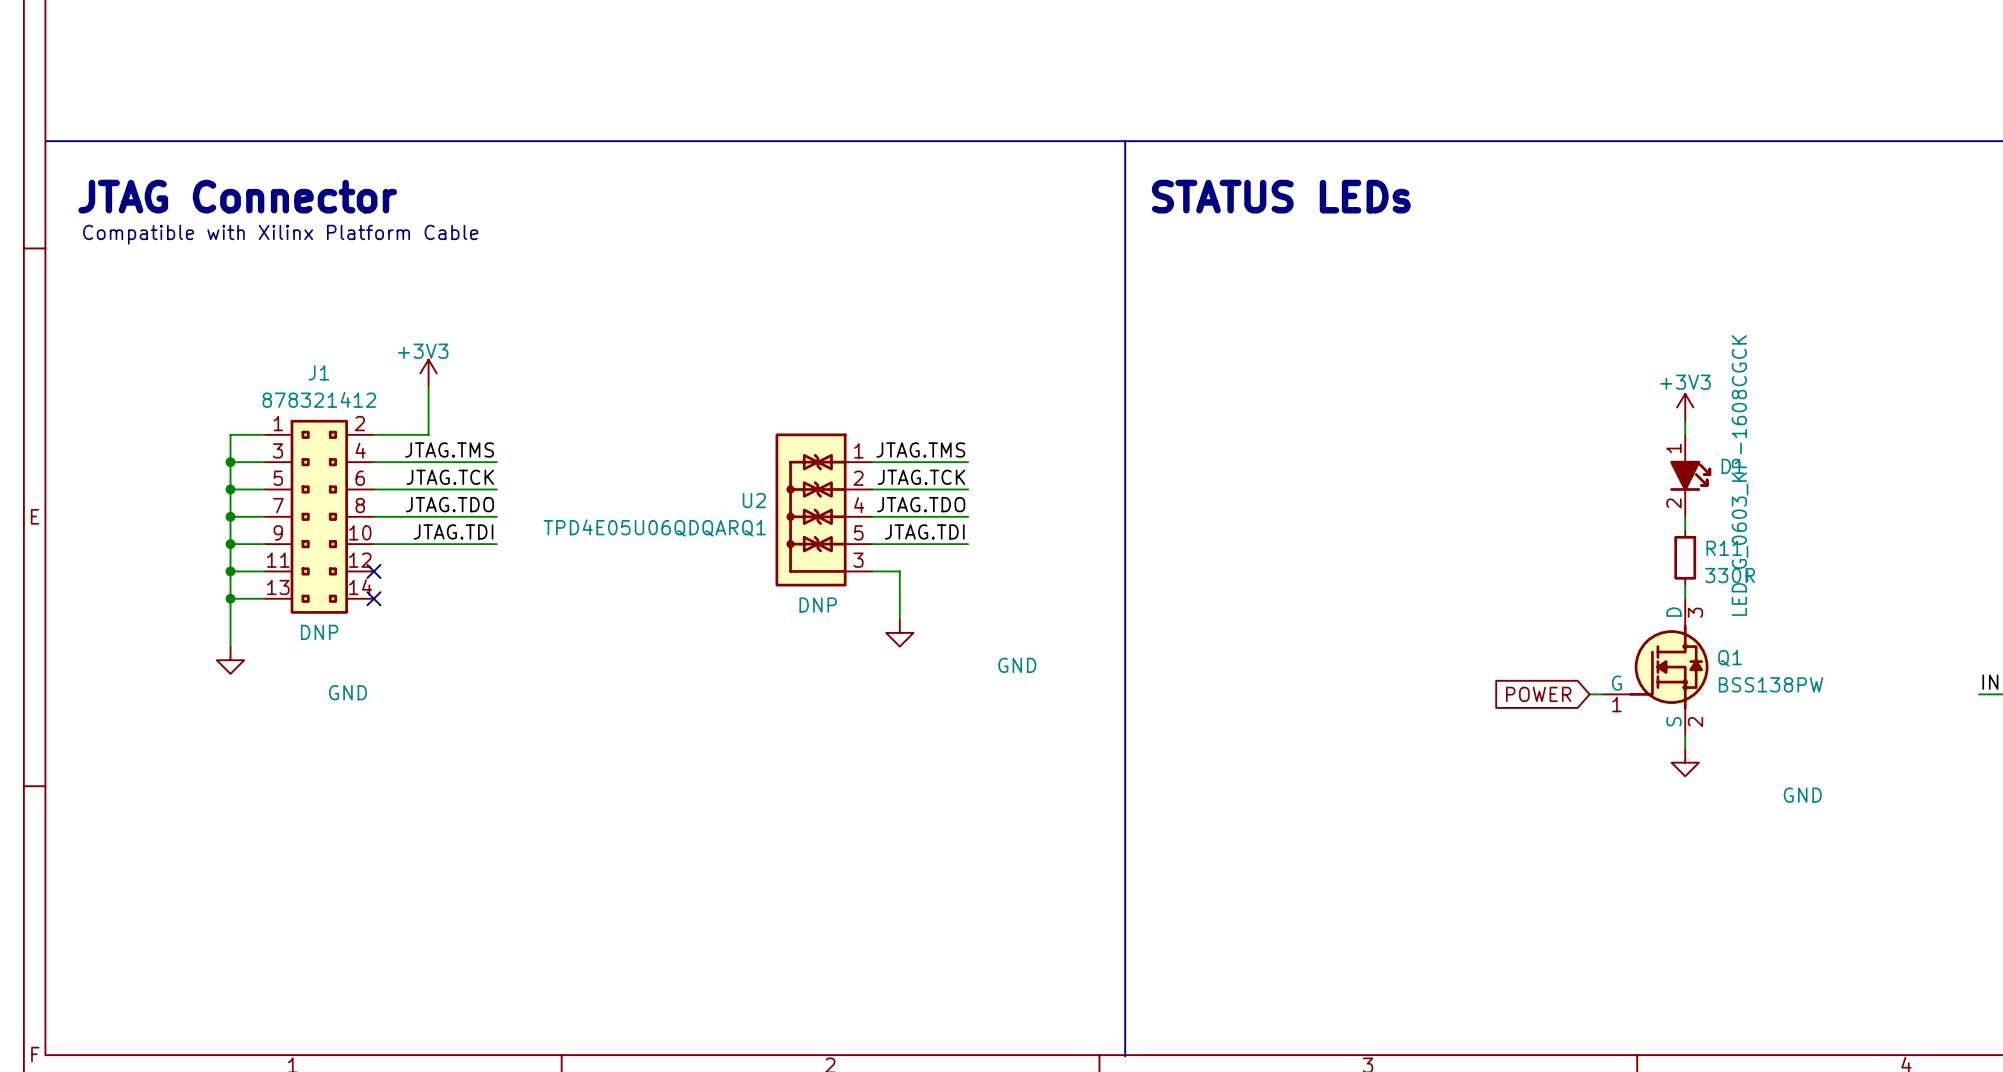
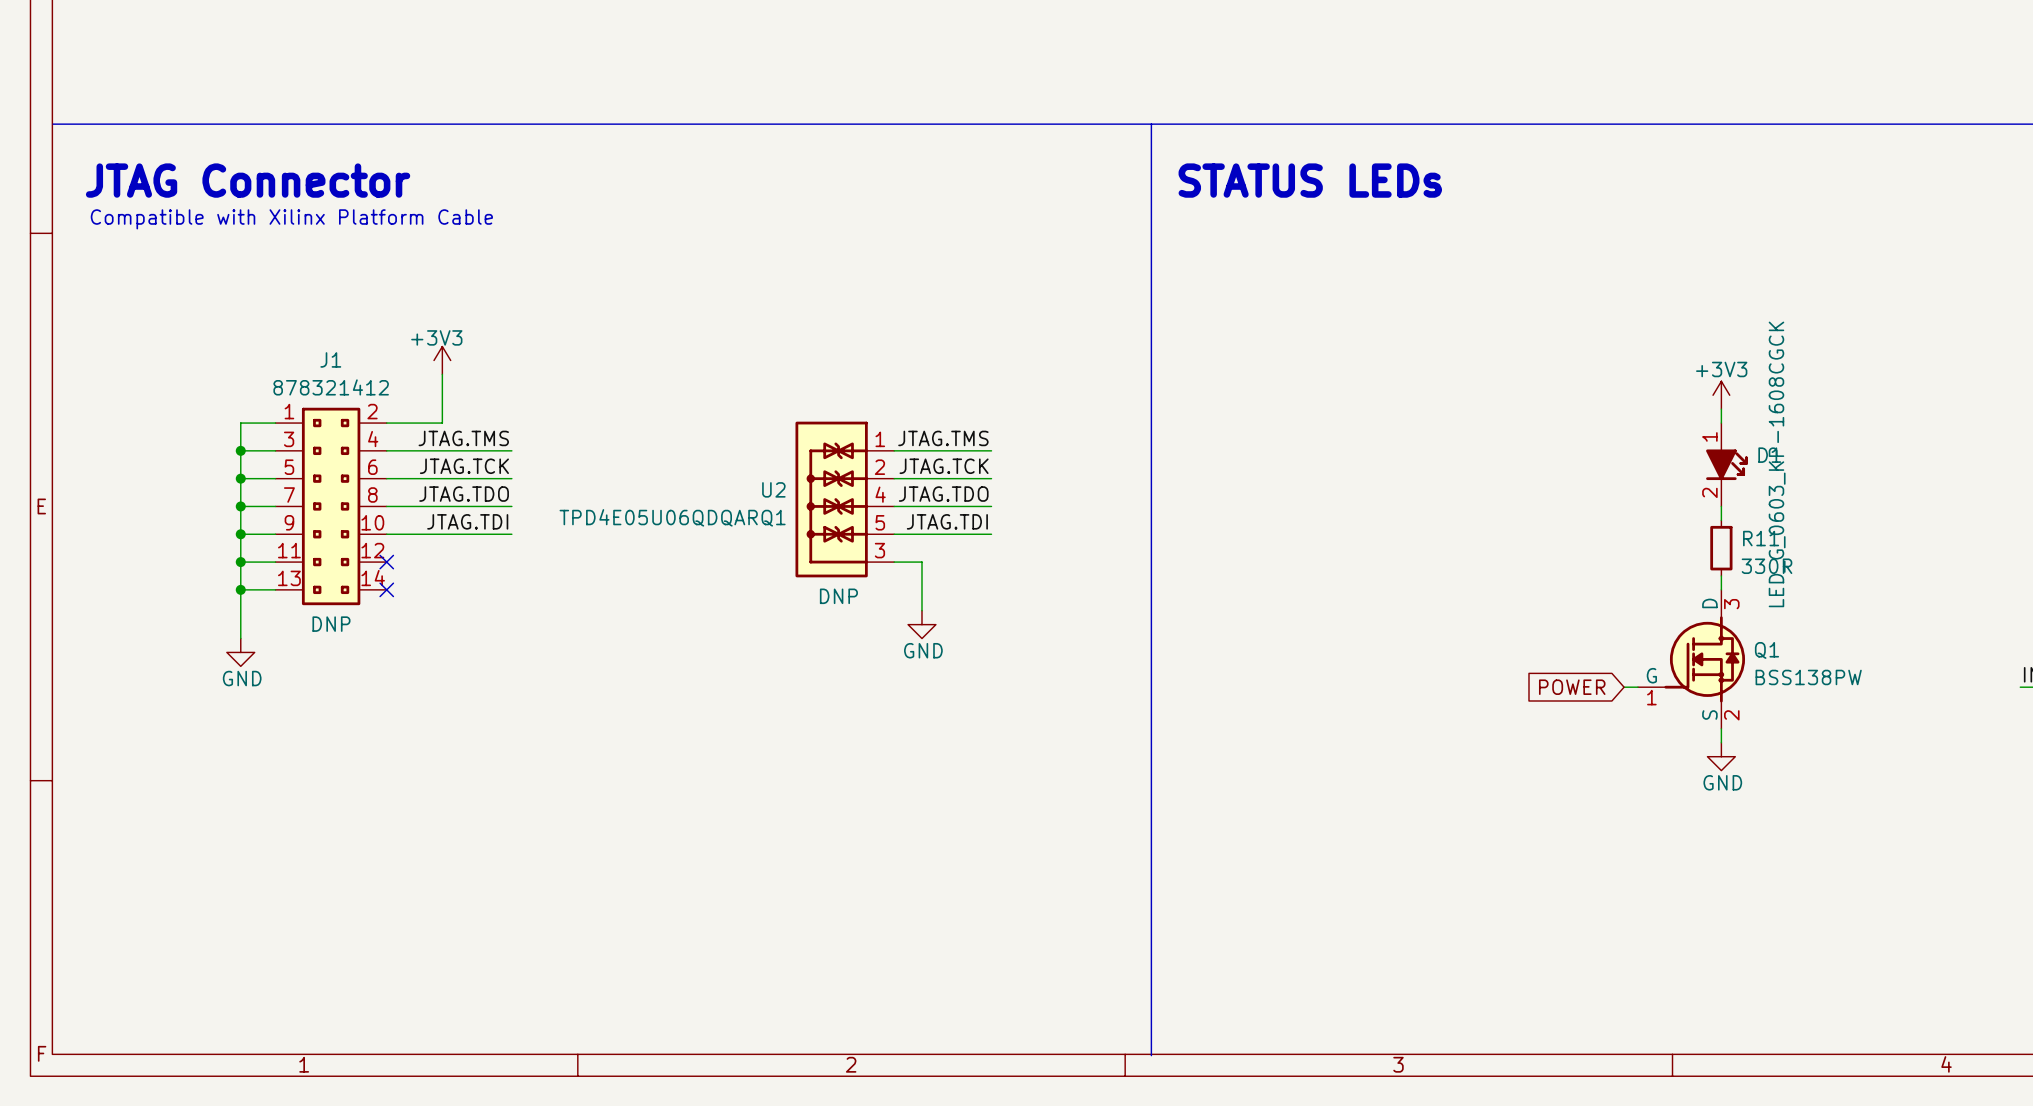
power symbol text position: GND (1017, 665) -> GND (923, 650)
power symbol text position: GND (348, 692) -> GND (242, 678)
power symbol text position: GND (1802, 795) -> GND (1722, 782)

